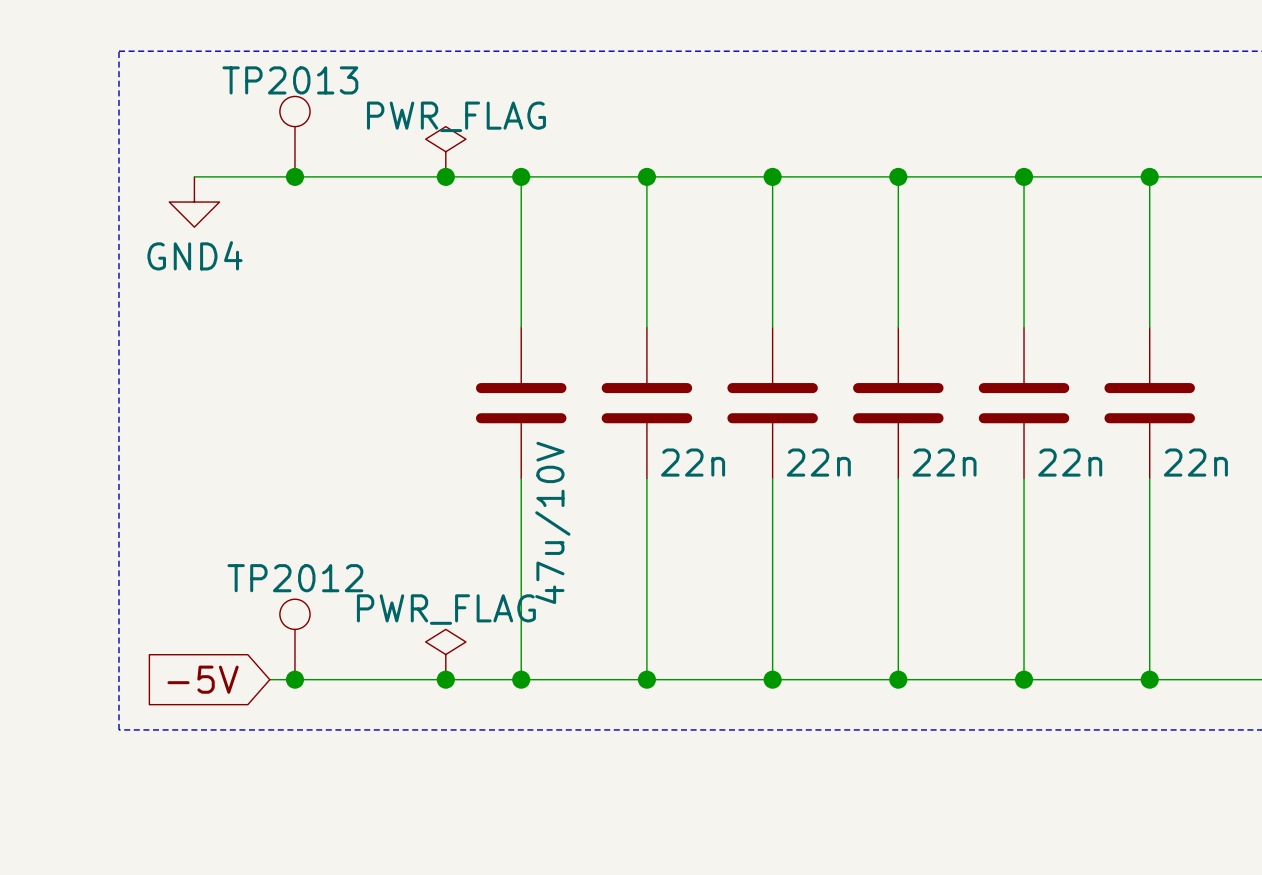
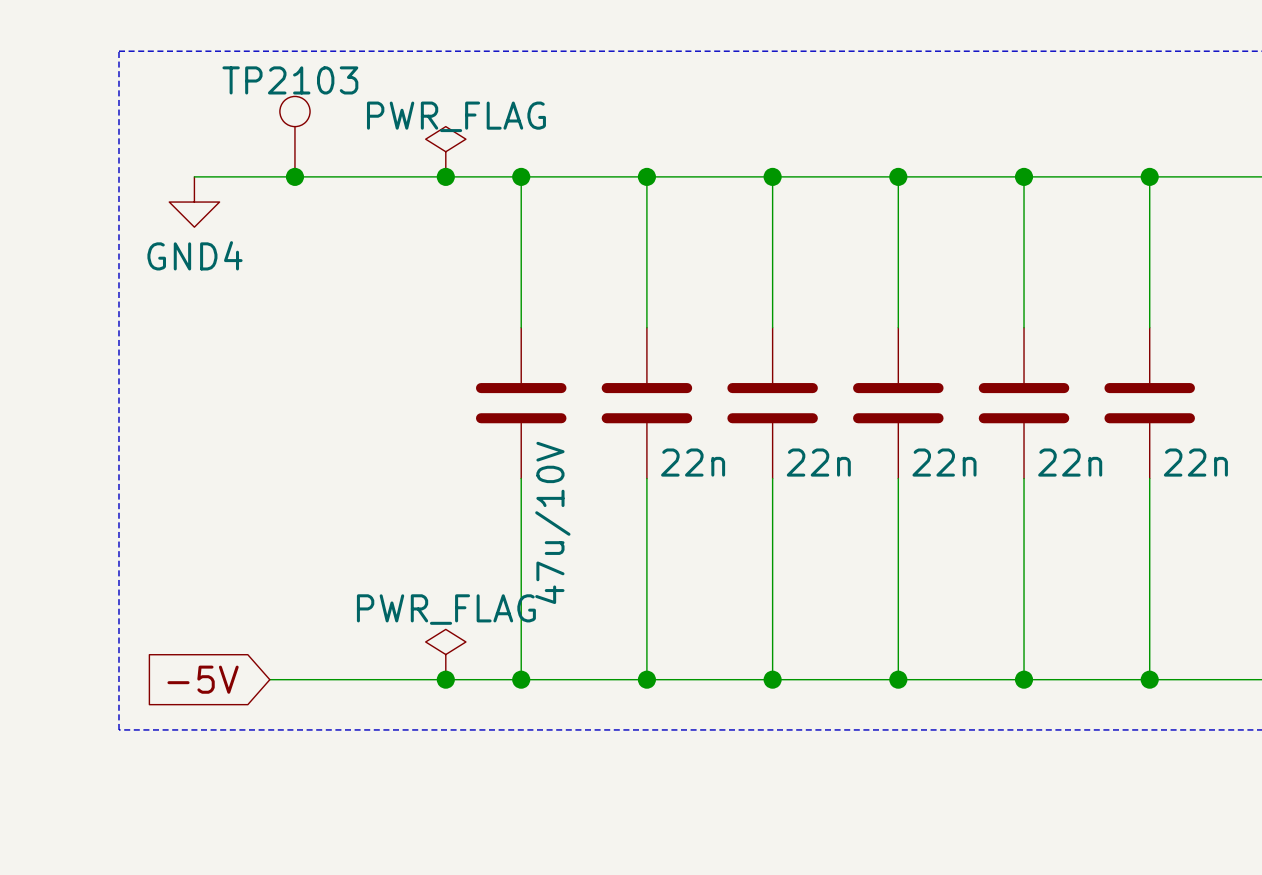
TP2013 name: TP2013 (290, 80) -> TP2103 (290, 80)
TP2012: (294, 639) -> none
junction: (294, 679) -> none

